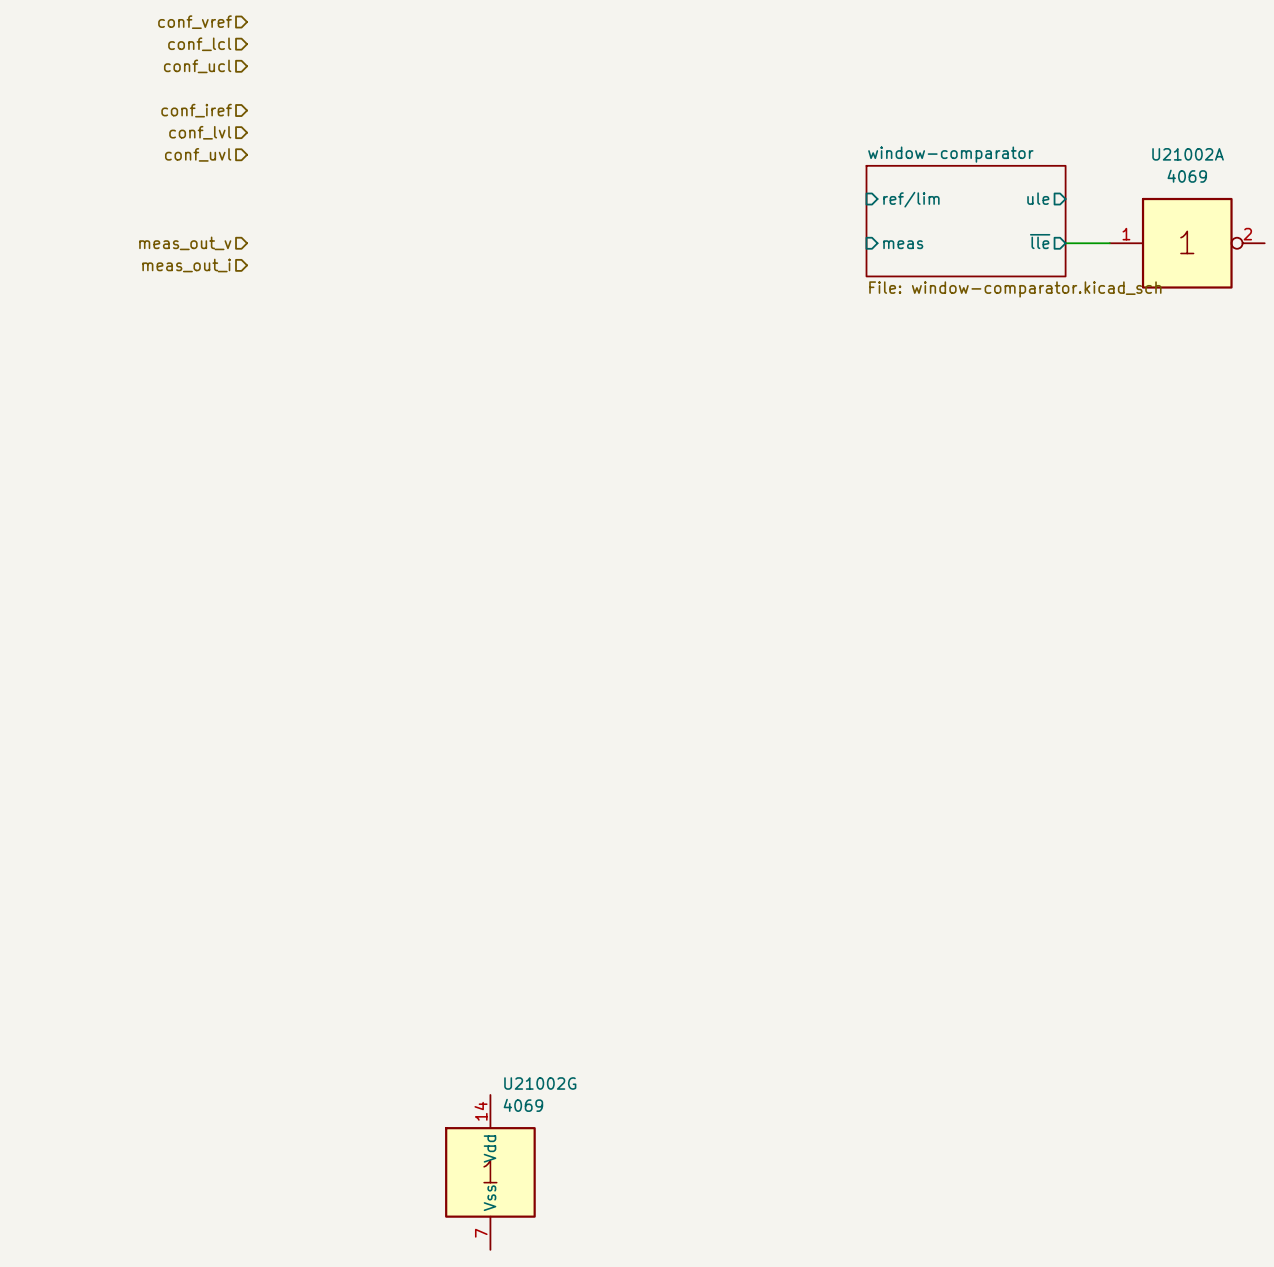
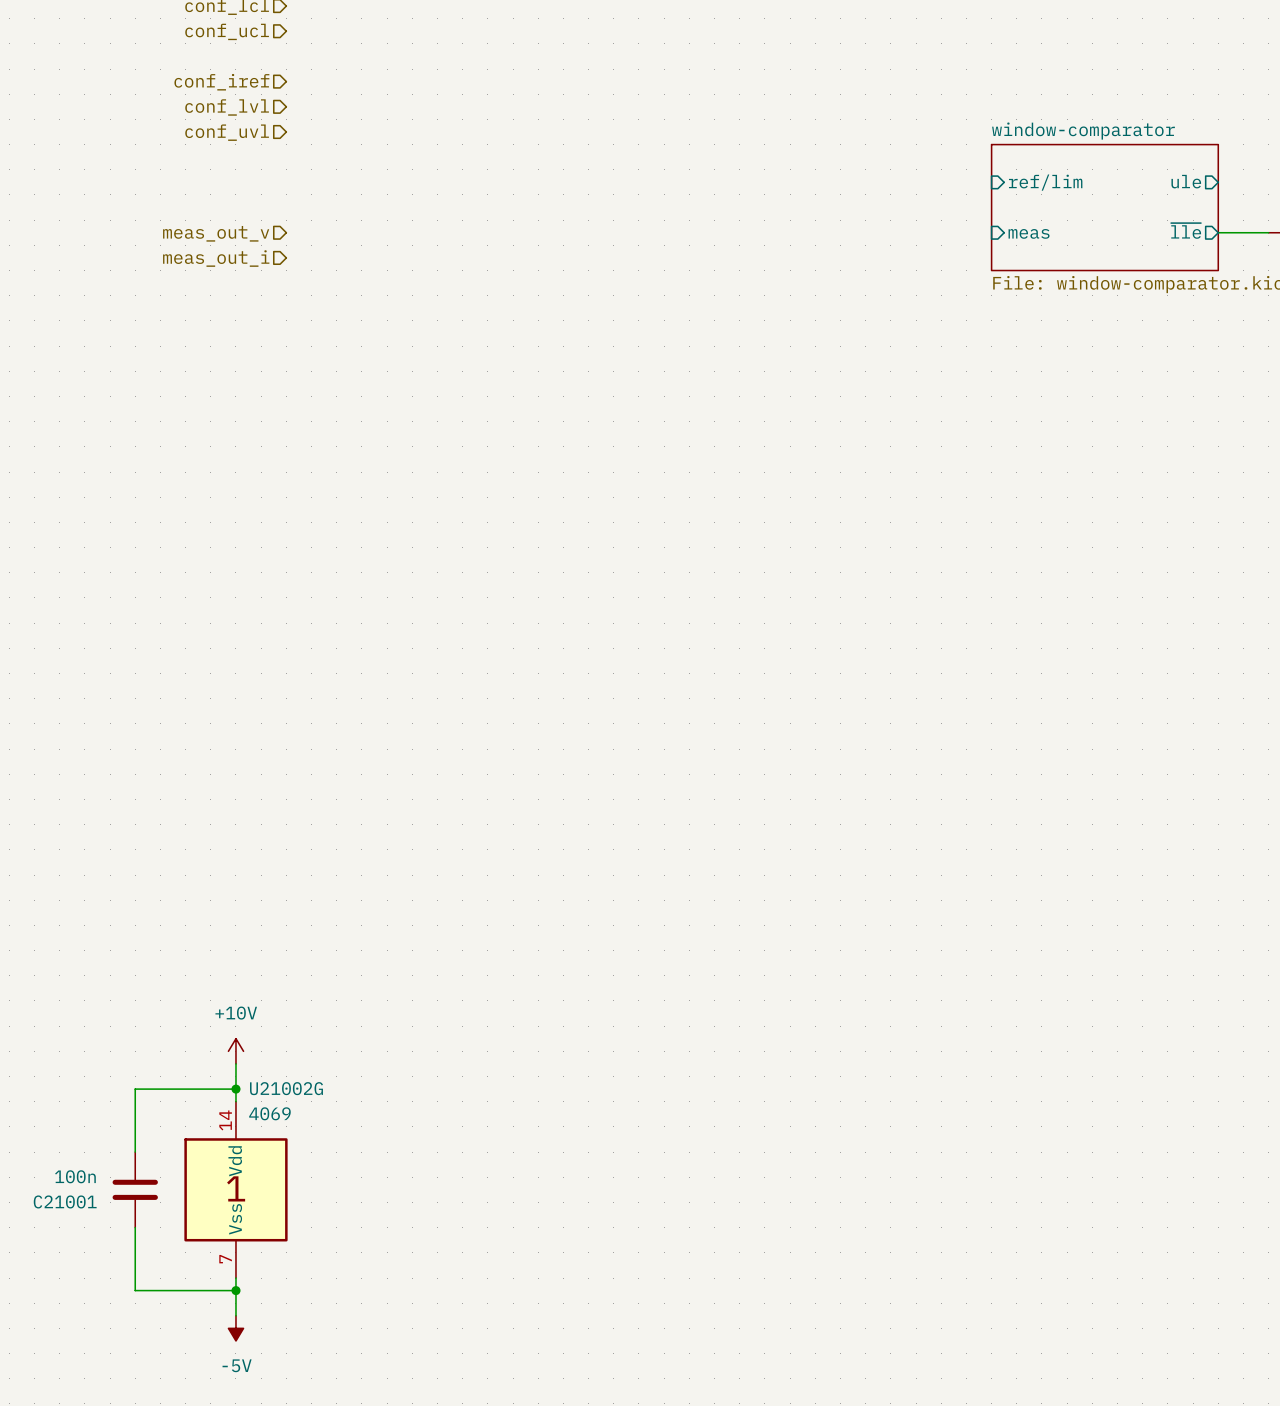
power symbol: none -> +10V (235, 1051)
wire: none -> (235, 1063) (235, 1101)
wire: none -> (235, 1089) (135, 1089) (135, 1152)
junction: none -> (235, 1089)
C21001: none -> 100n (135, 1189)
wire: none -> (135, 1227) (135, 1290) (235, 1290)
wire: none -> (235, 1278) (235, 1315)
junction: none -> (235, 1290)
U21002G position: (490, 1172) -> (235, 1189)
power symbol: none -> -5V (235, 1328)

